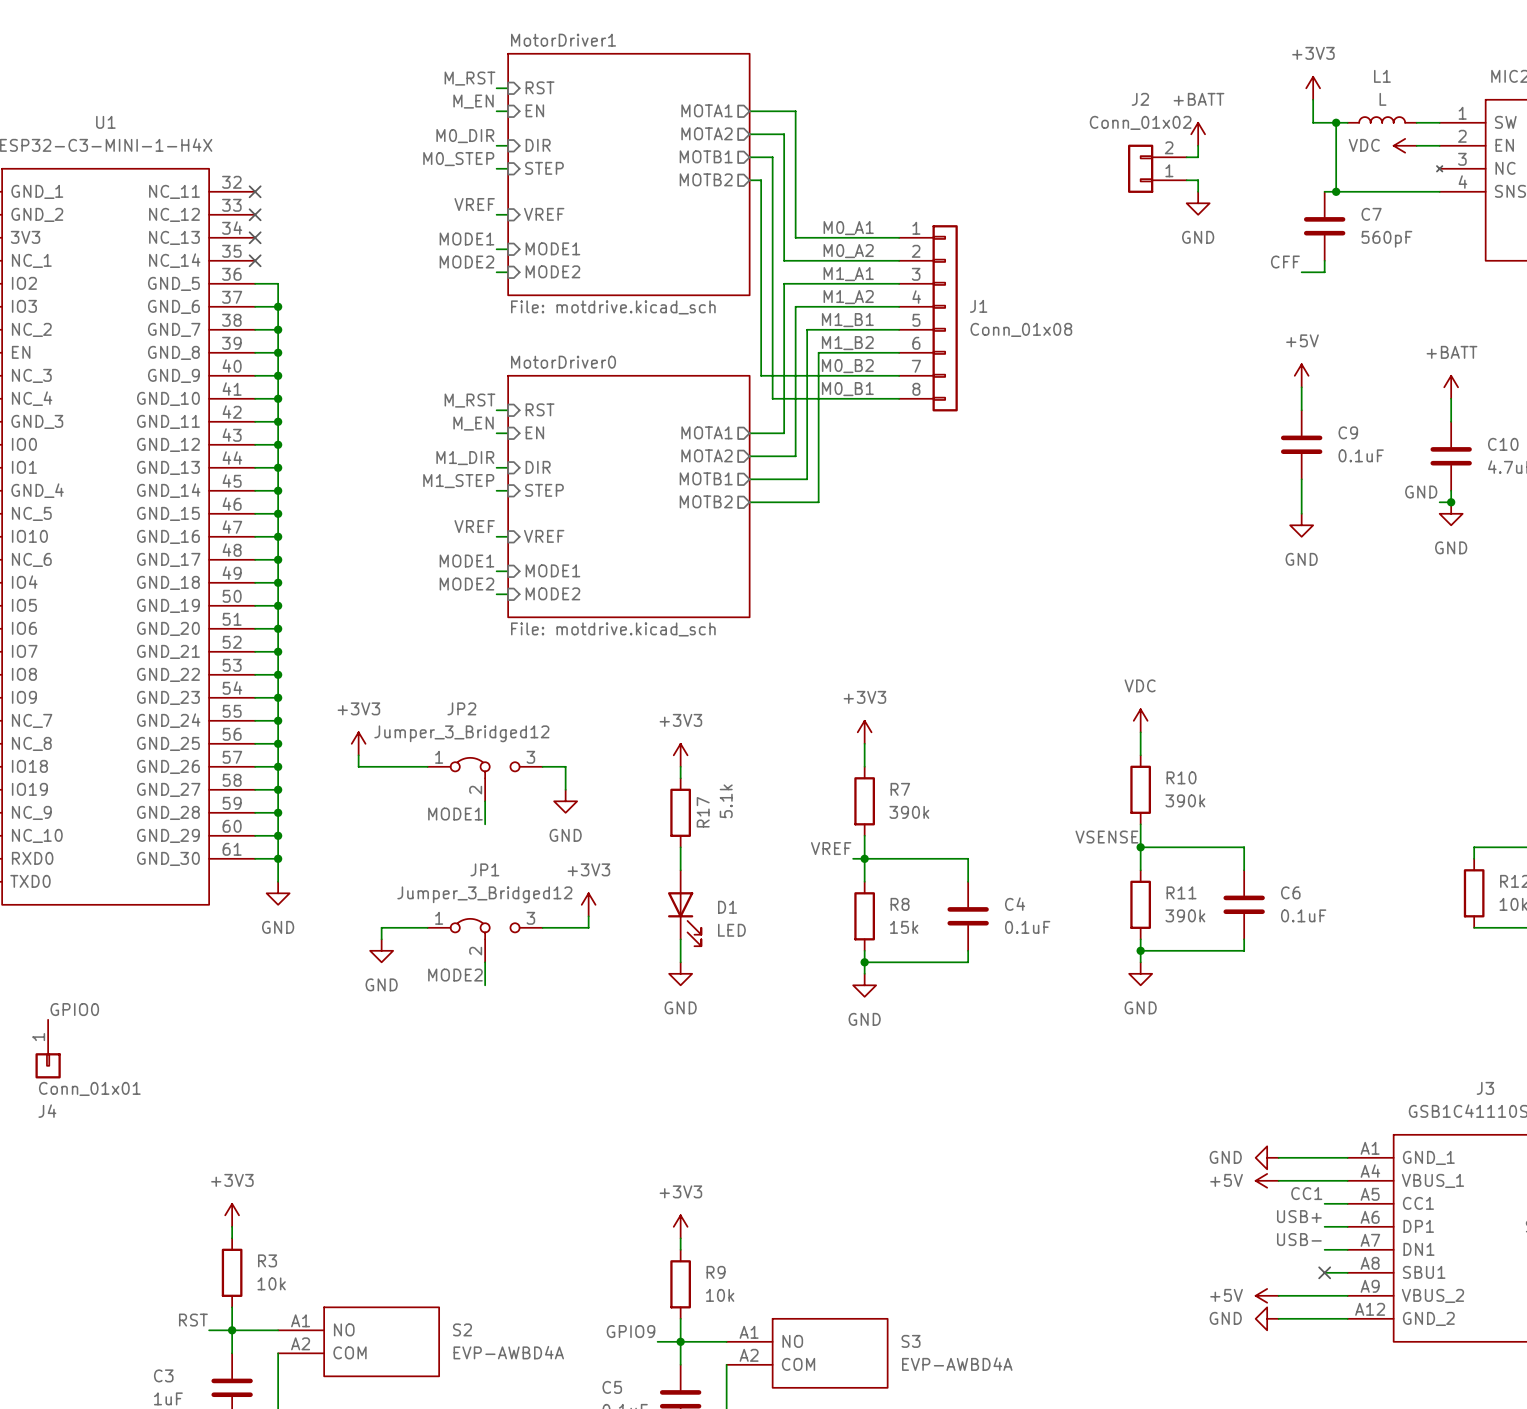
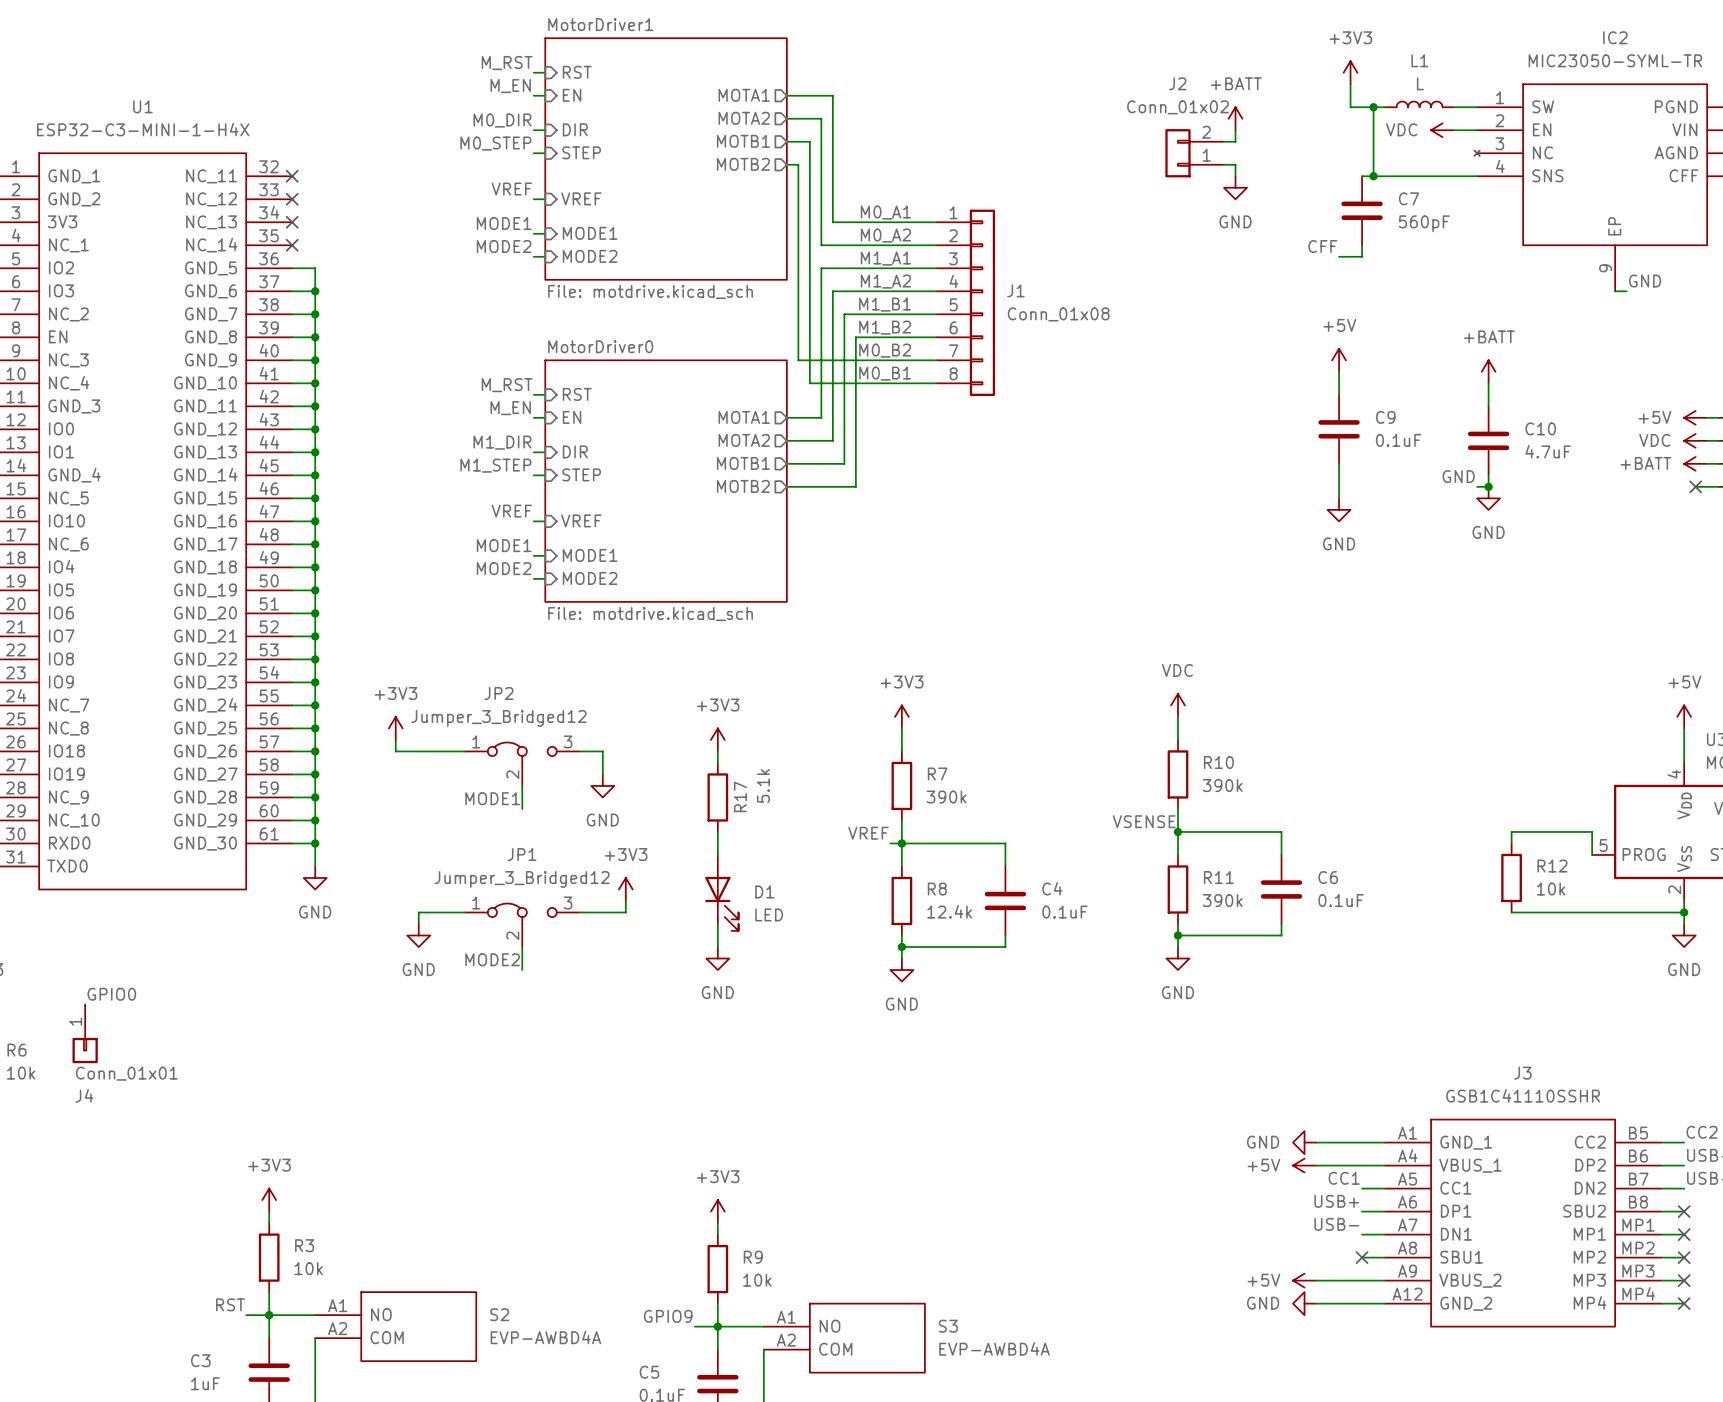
R8 value: 15k (904, 927) -> 12.4k (949, 911)

